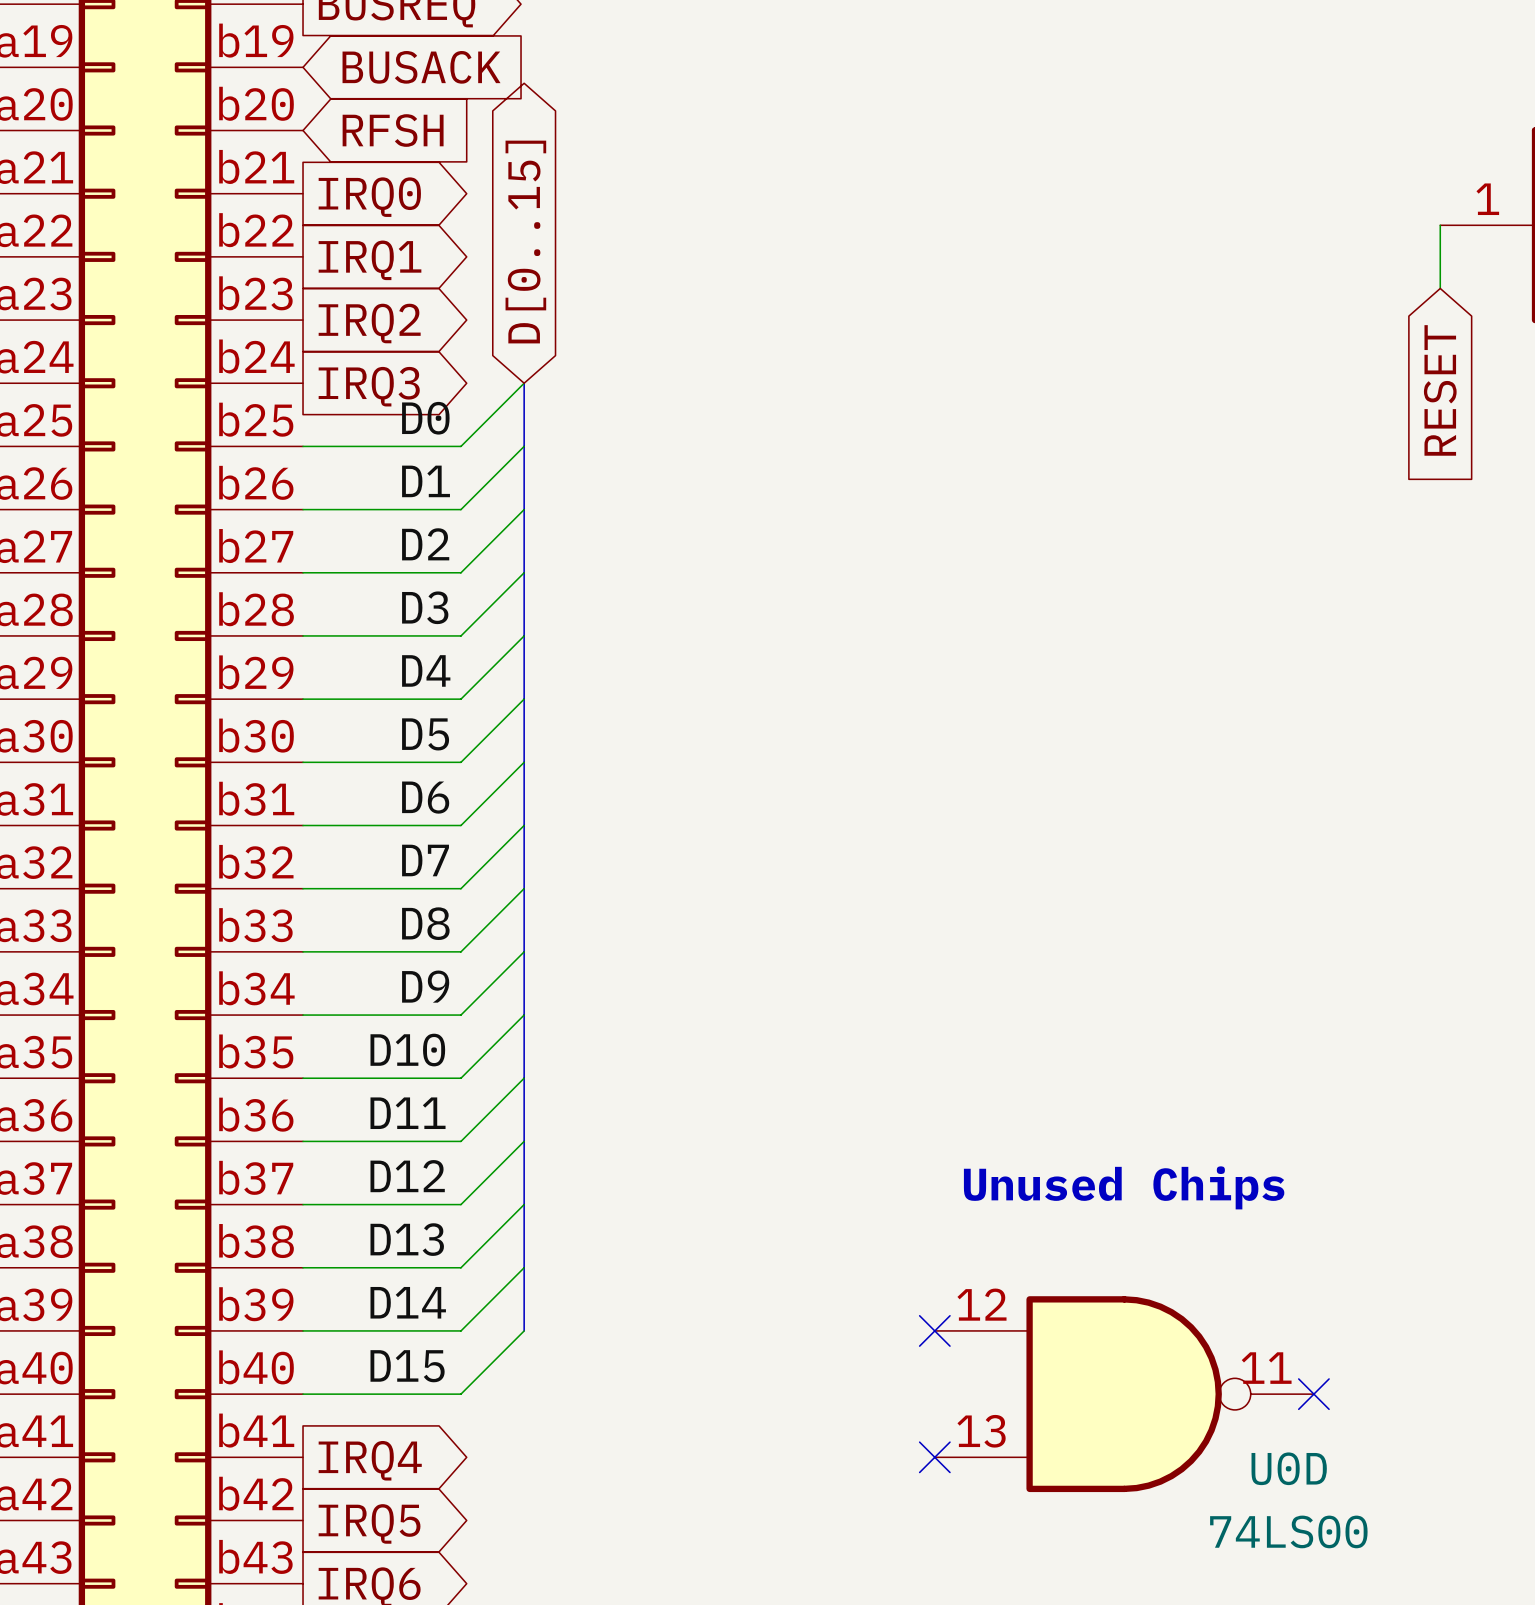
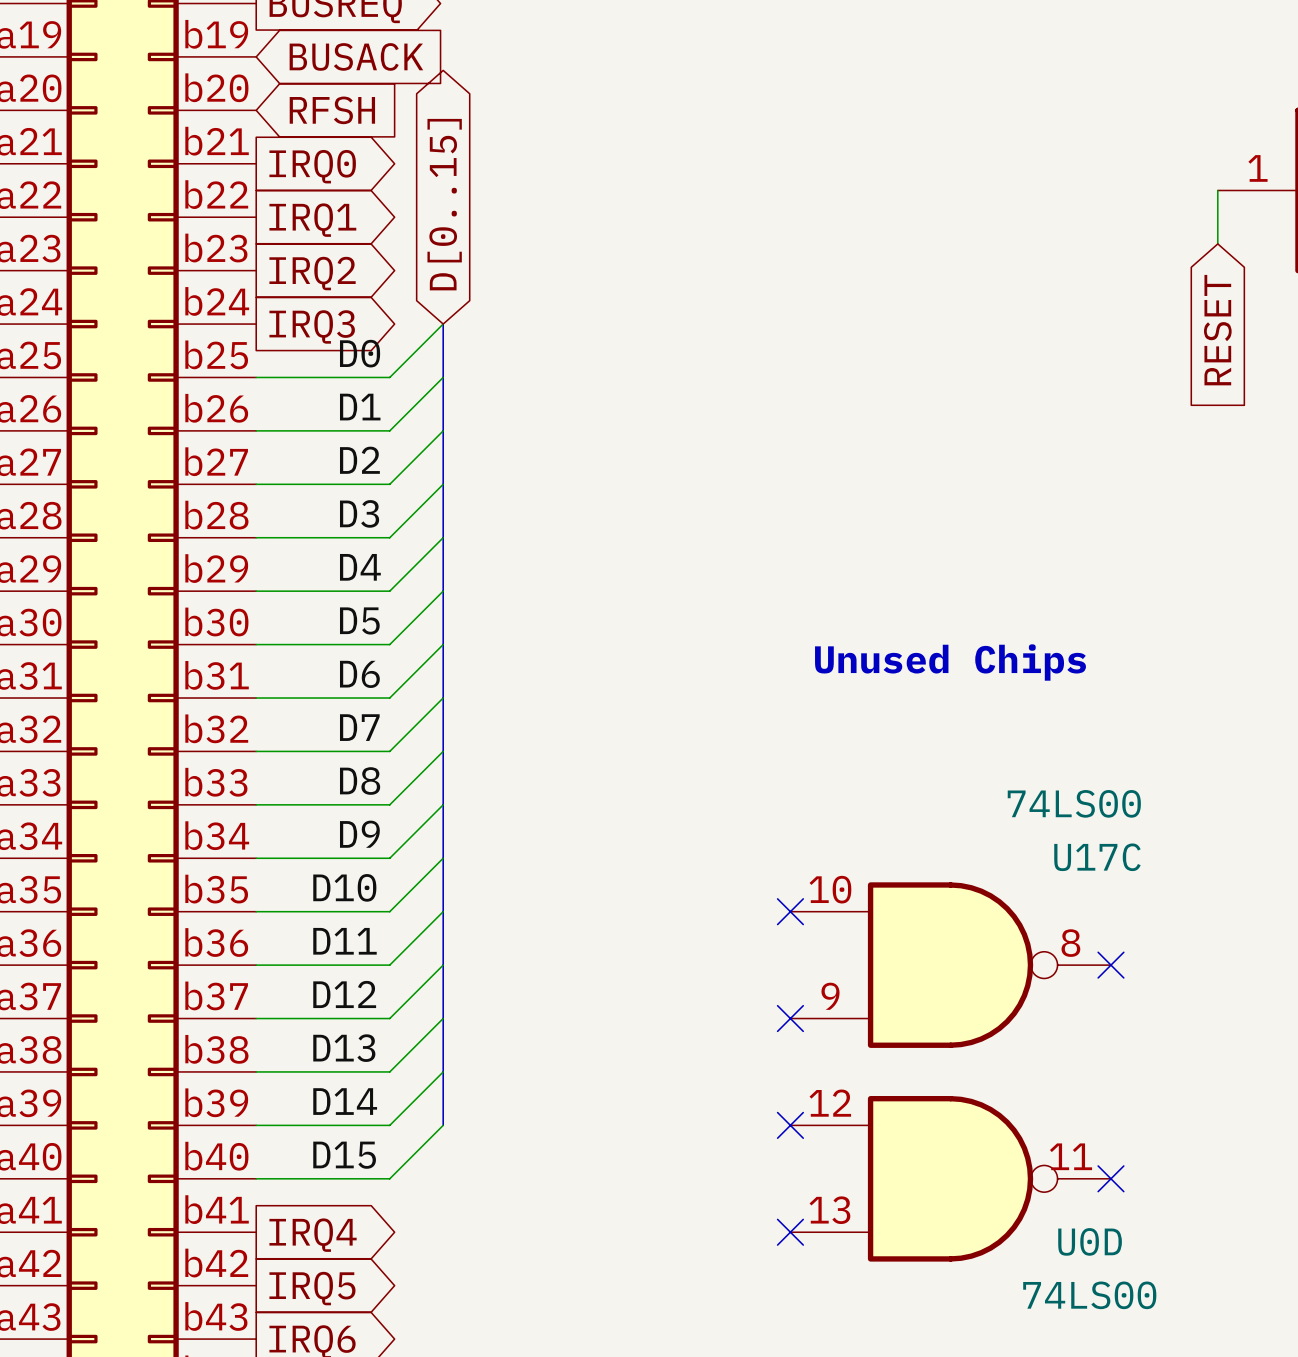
no-connect mark: none -> (790, 911)
U17C: none -> 74LS00 (950, 965)
no-connect mark: none -> (1110, 965)
text position: Unused Chips (1124, 1187) -> Unused Chips (950, 662)
no-connect mark: none -> (790, 1018)

